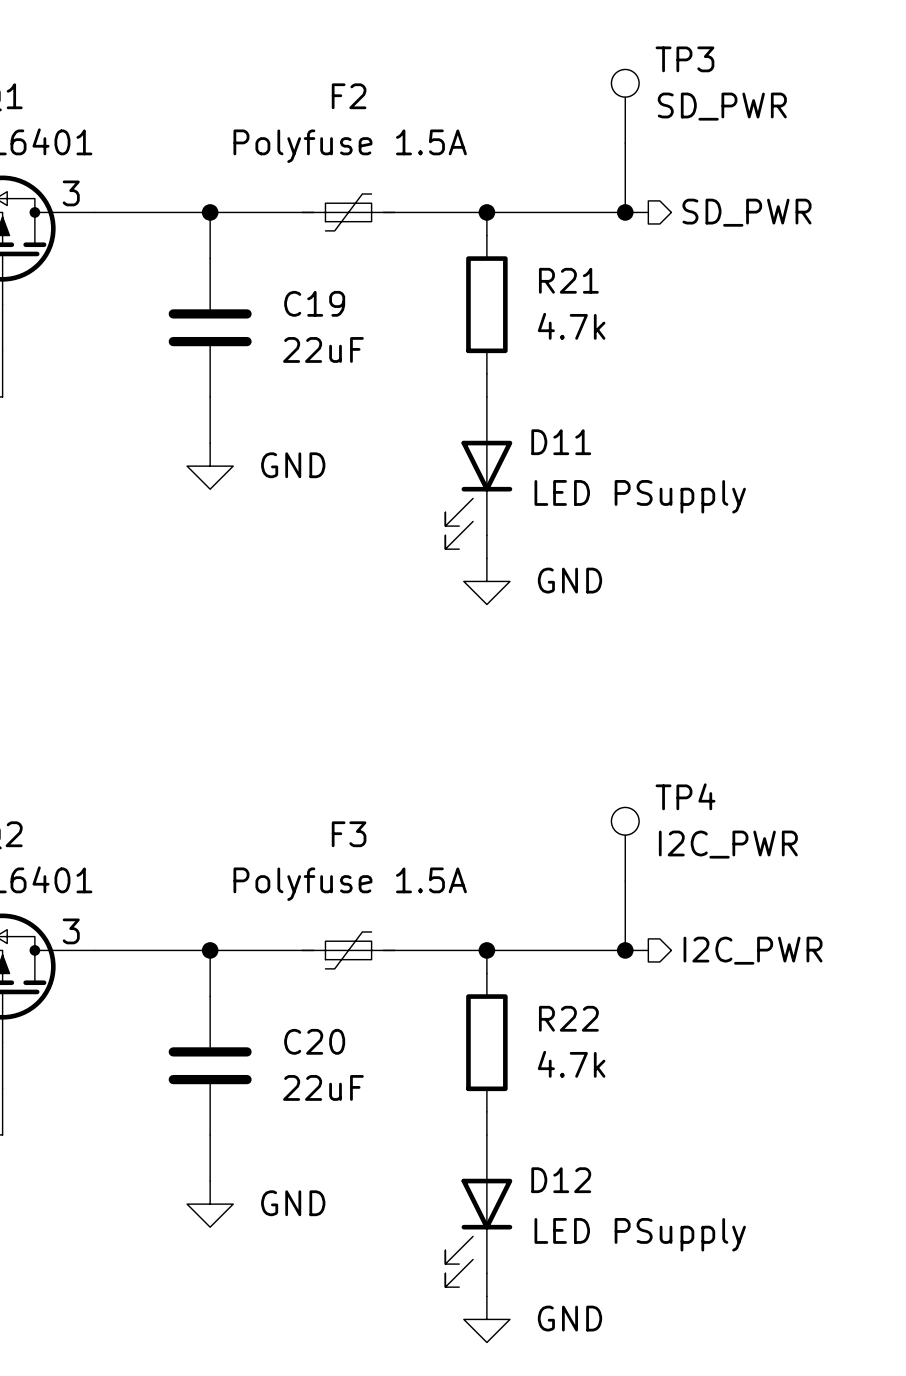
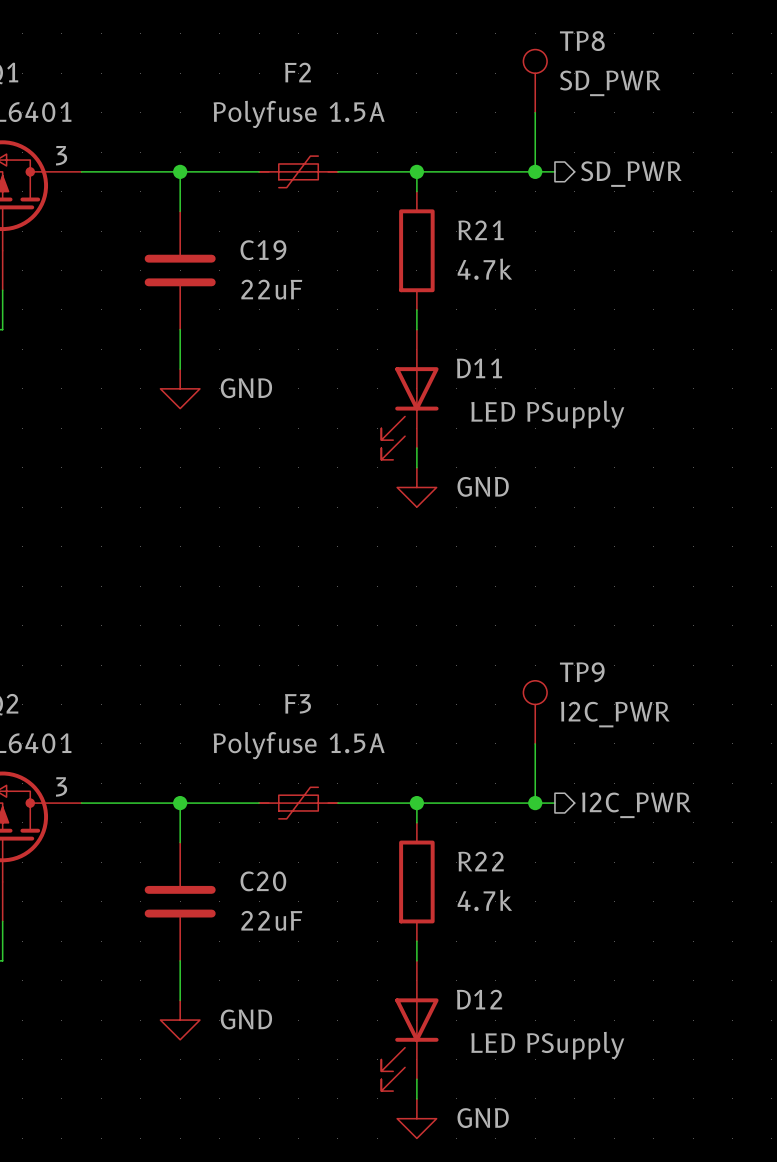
TP3 name: TP3 (684, 59) -> TP8 (582, 41)
TP4 name: TP4 (685, 796) -> TP9 (582, 672)

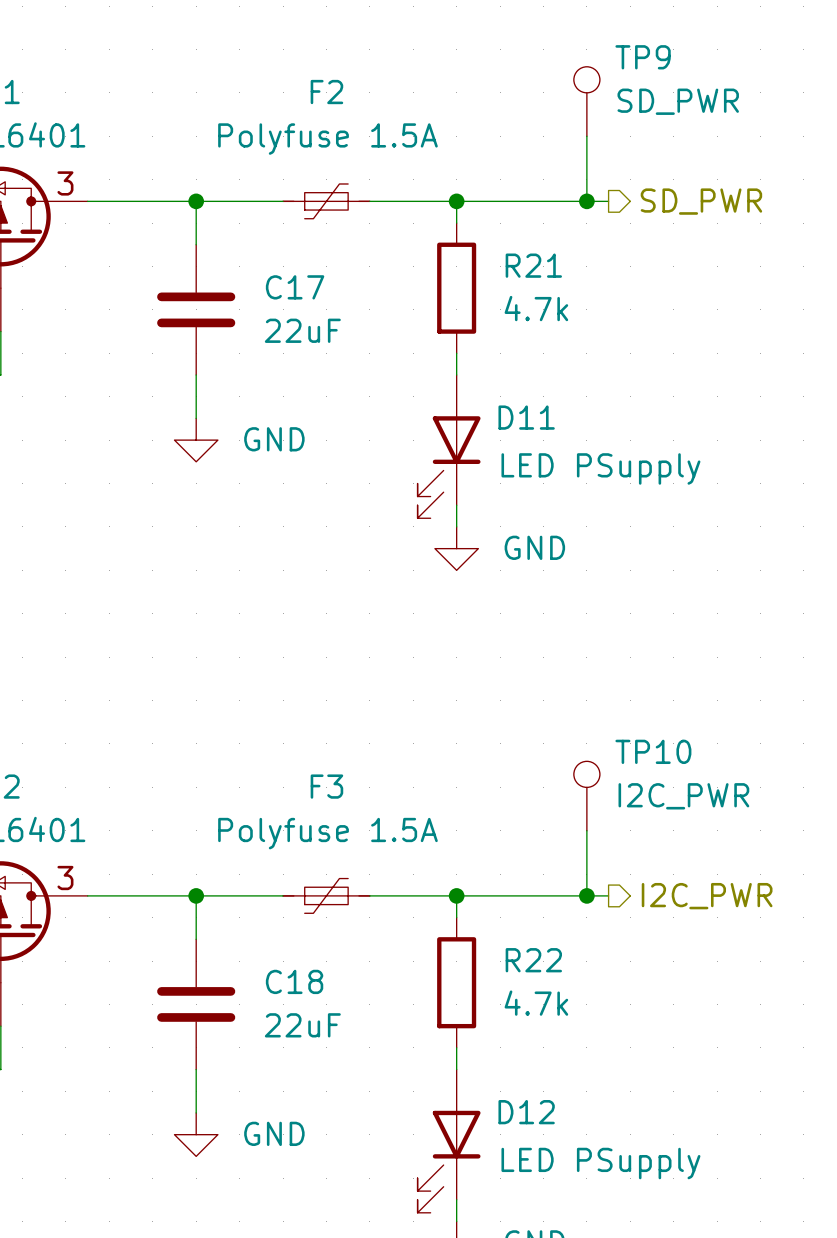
TP8 name: TP8 (582, 41) -> TP9 (643, 57)
C19 name: C19 (263, 250) -> C17 (295, 287)
TP9 name: TP9 (582, 672) -> TP10 (653, 751)
C20 name: C20 (263, 881) -> C18 (294, 981)

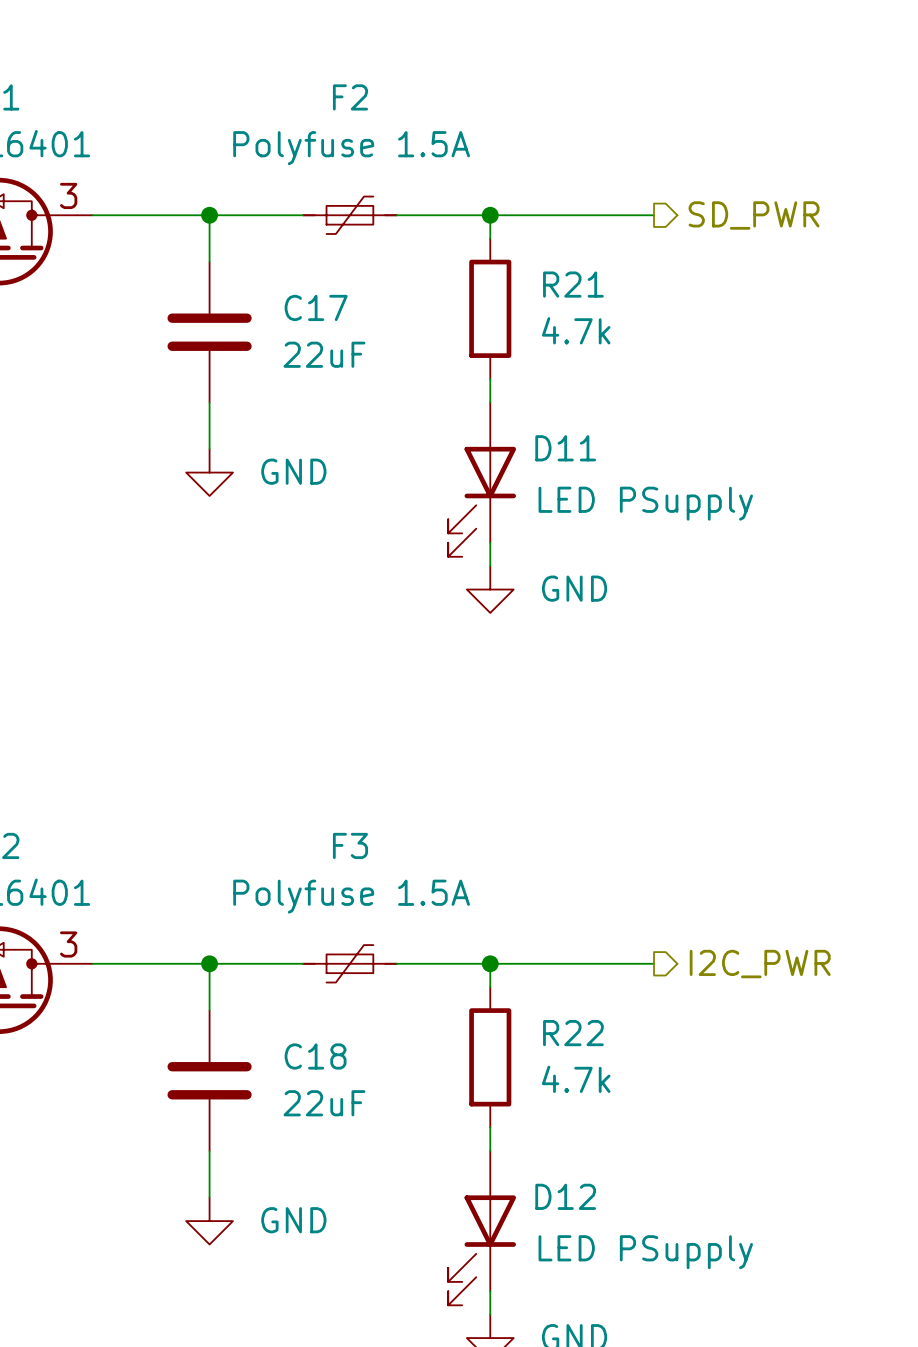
TP9: SD_PWR (586, 101) -> none
wire: (586, 136) (586, 201) -> none
junction: (586, 201) -> none
TP10: I2C_PWR (586, 796) -> none
wire: (586, 830) (586, 895) -> none
junction: (586, 895) -> none

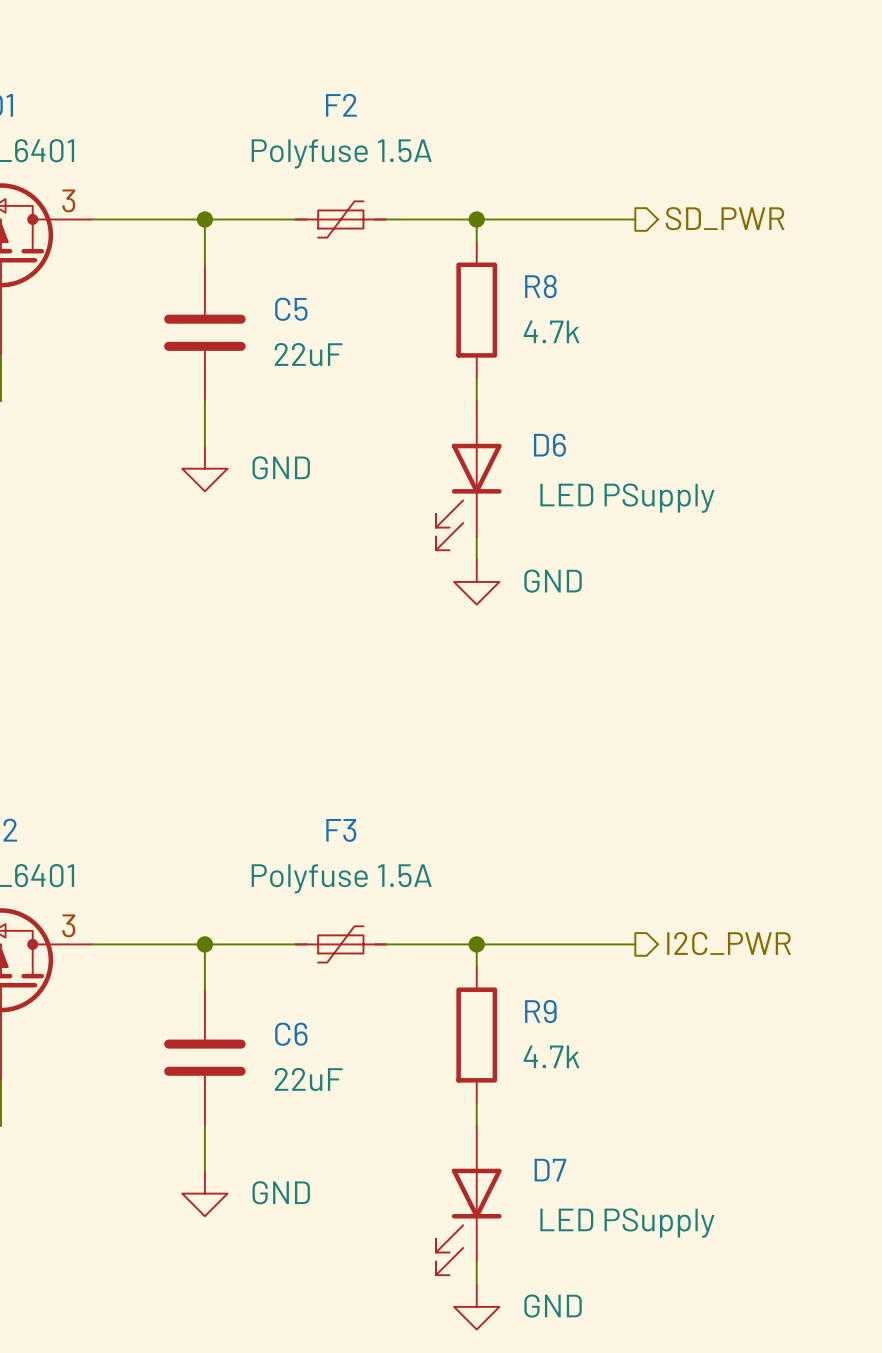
R21 name: R21 (573, 284) -> R8 (540, 286)
C17 name: C17 (316, 307) -> C5 (291, 309)
D11 name: D11 (565, 448) -> D6 (549, 445)
R22 name: R22 (573, 1033) -> R9 (540, 1011)
C18 name: C18 (315, 1056) -> C6 (291, 1034)
D12 name: D12 (565, 1196) -> D7 (550, 1170)

